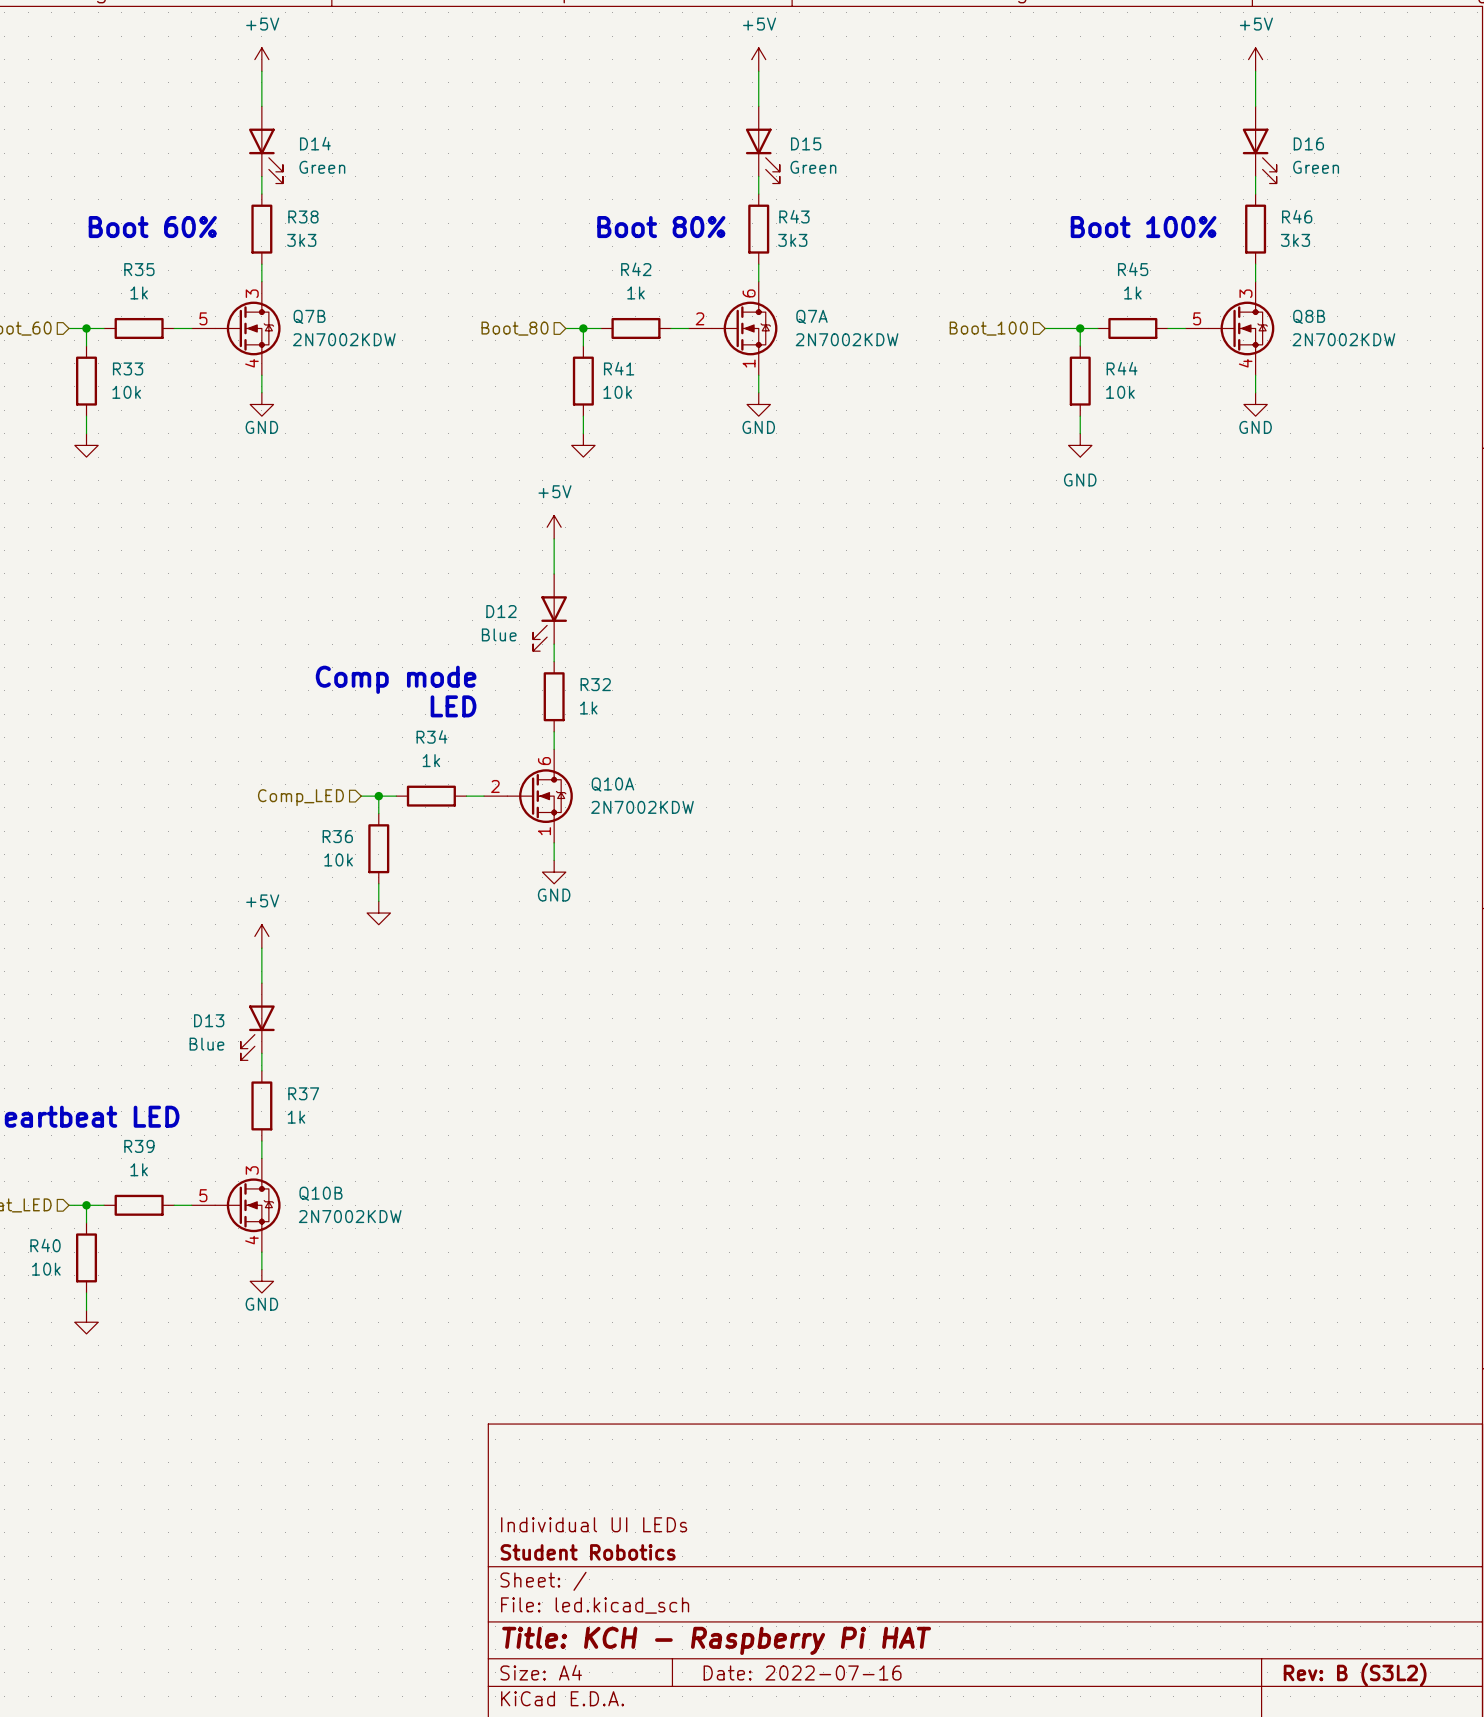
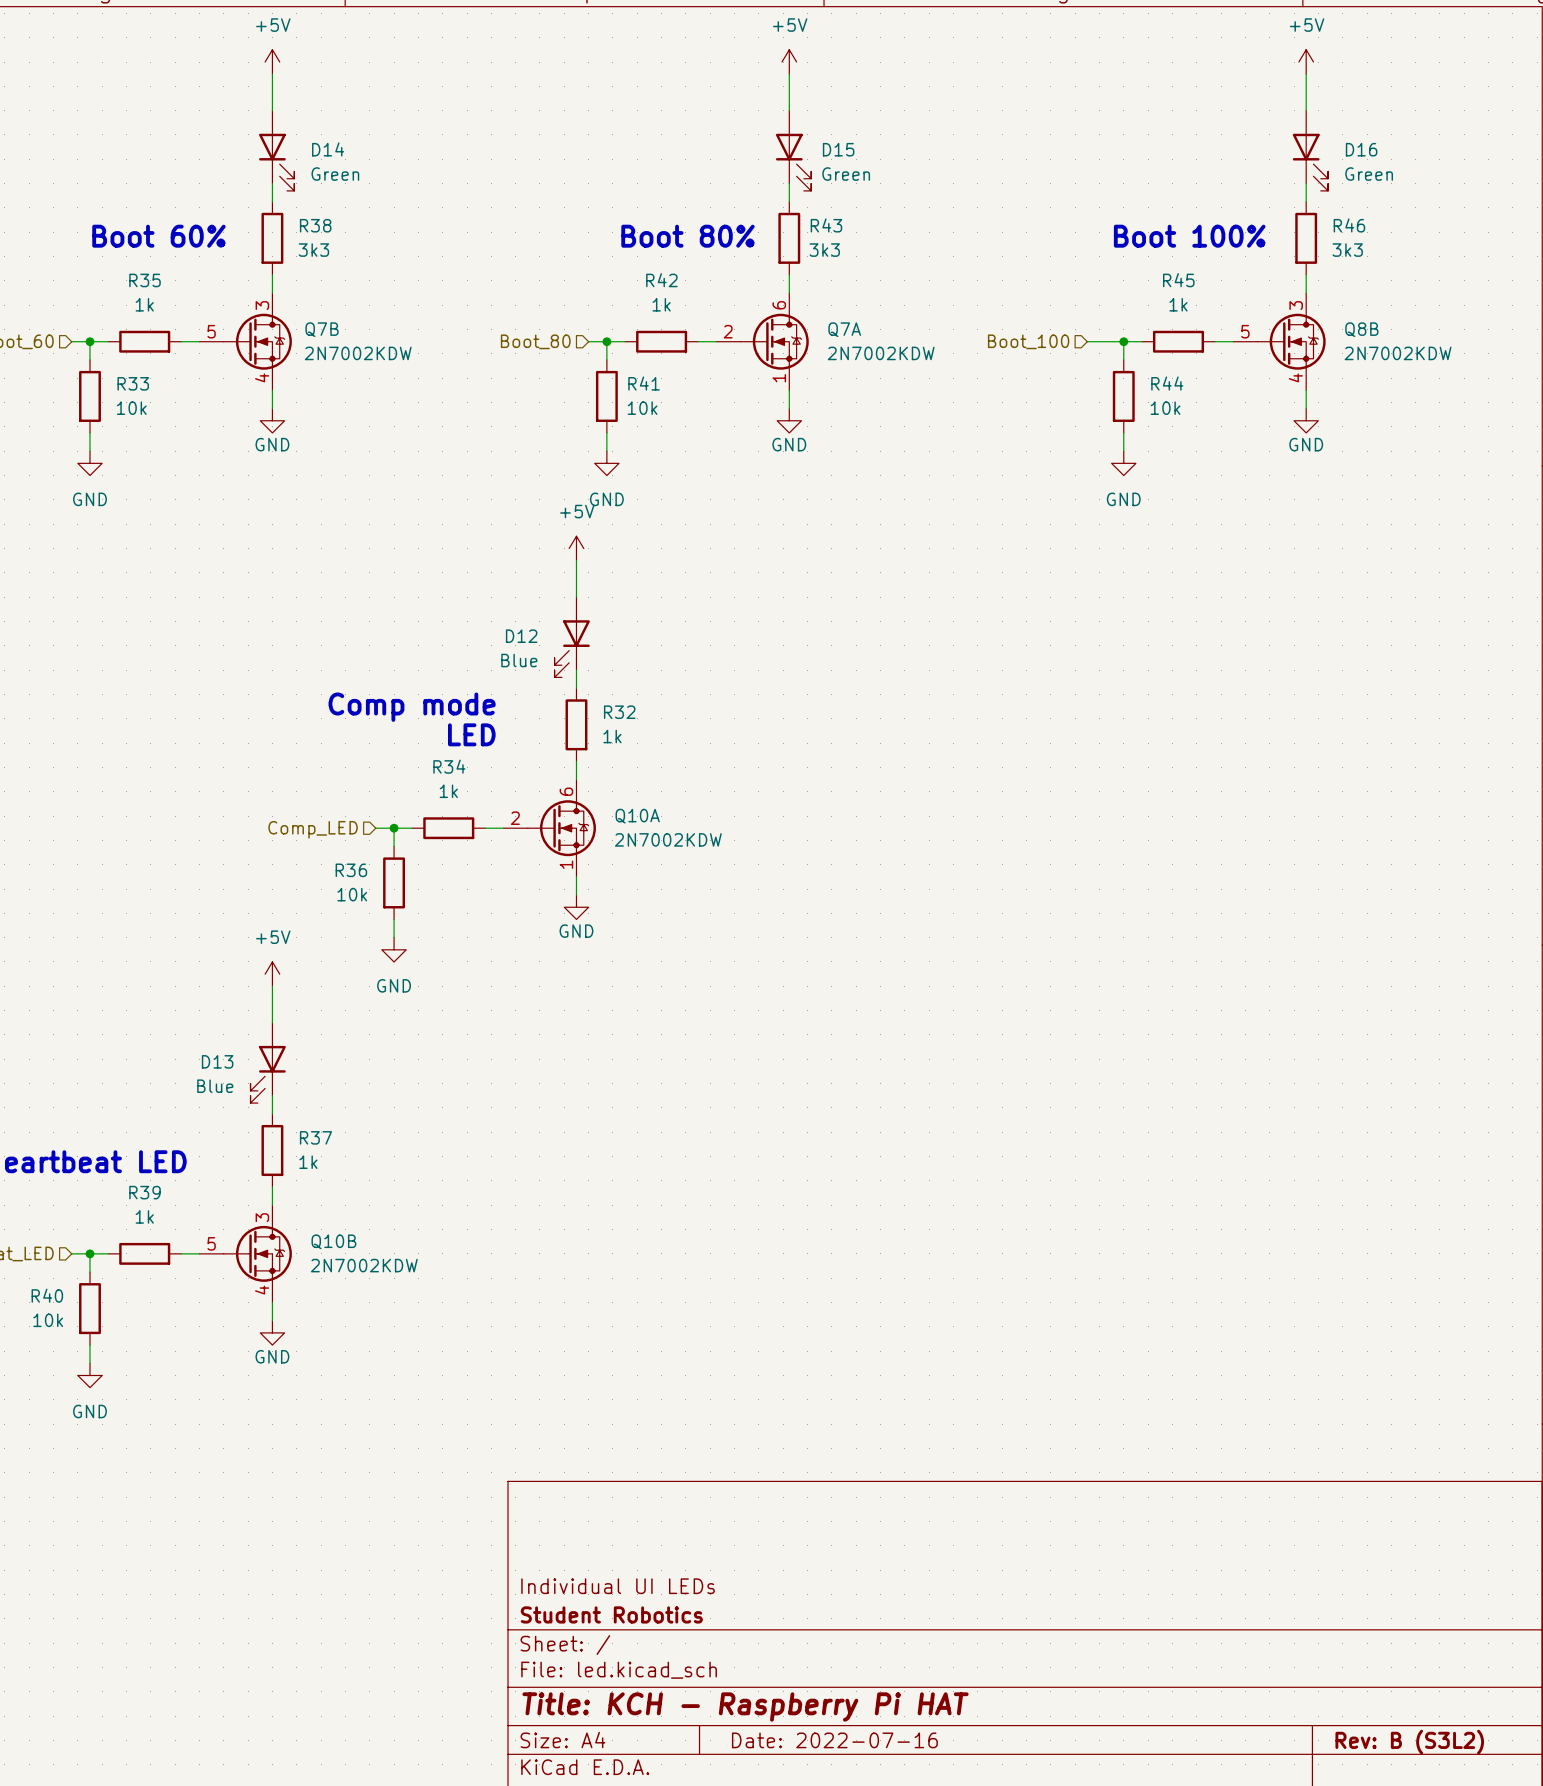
power symbol text: none -> GND (89, 499)
power symbol text: none -> GND (606, 499)
power symbol text: none -> GND (394, 985)
power symbol text: none -> GND (89, 1411)

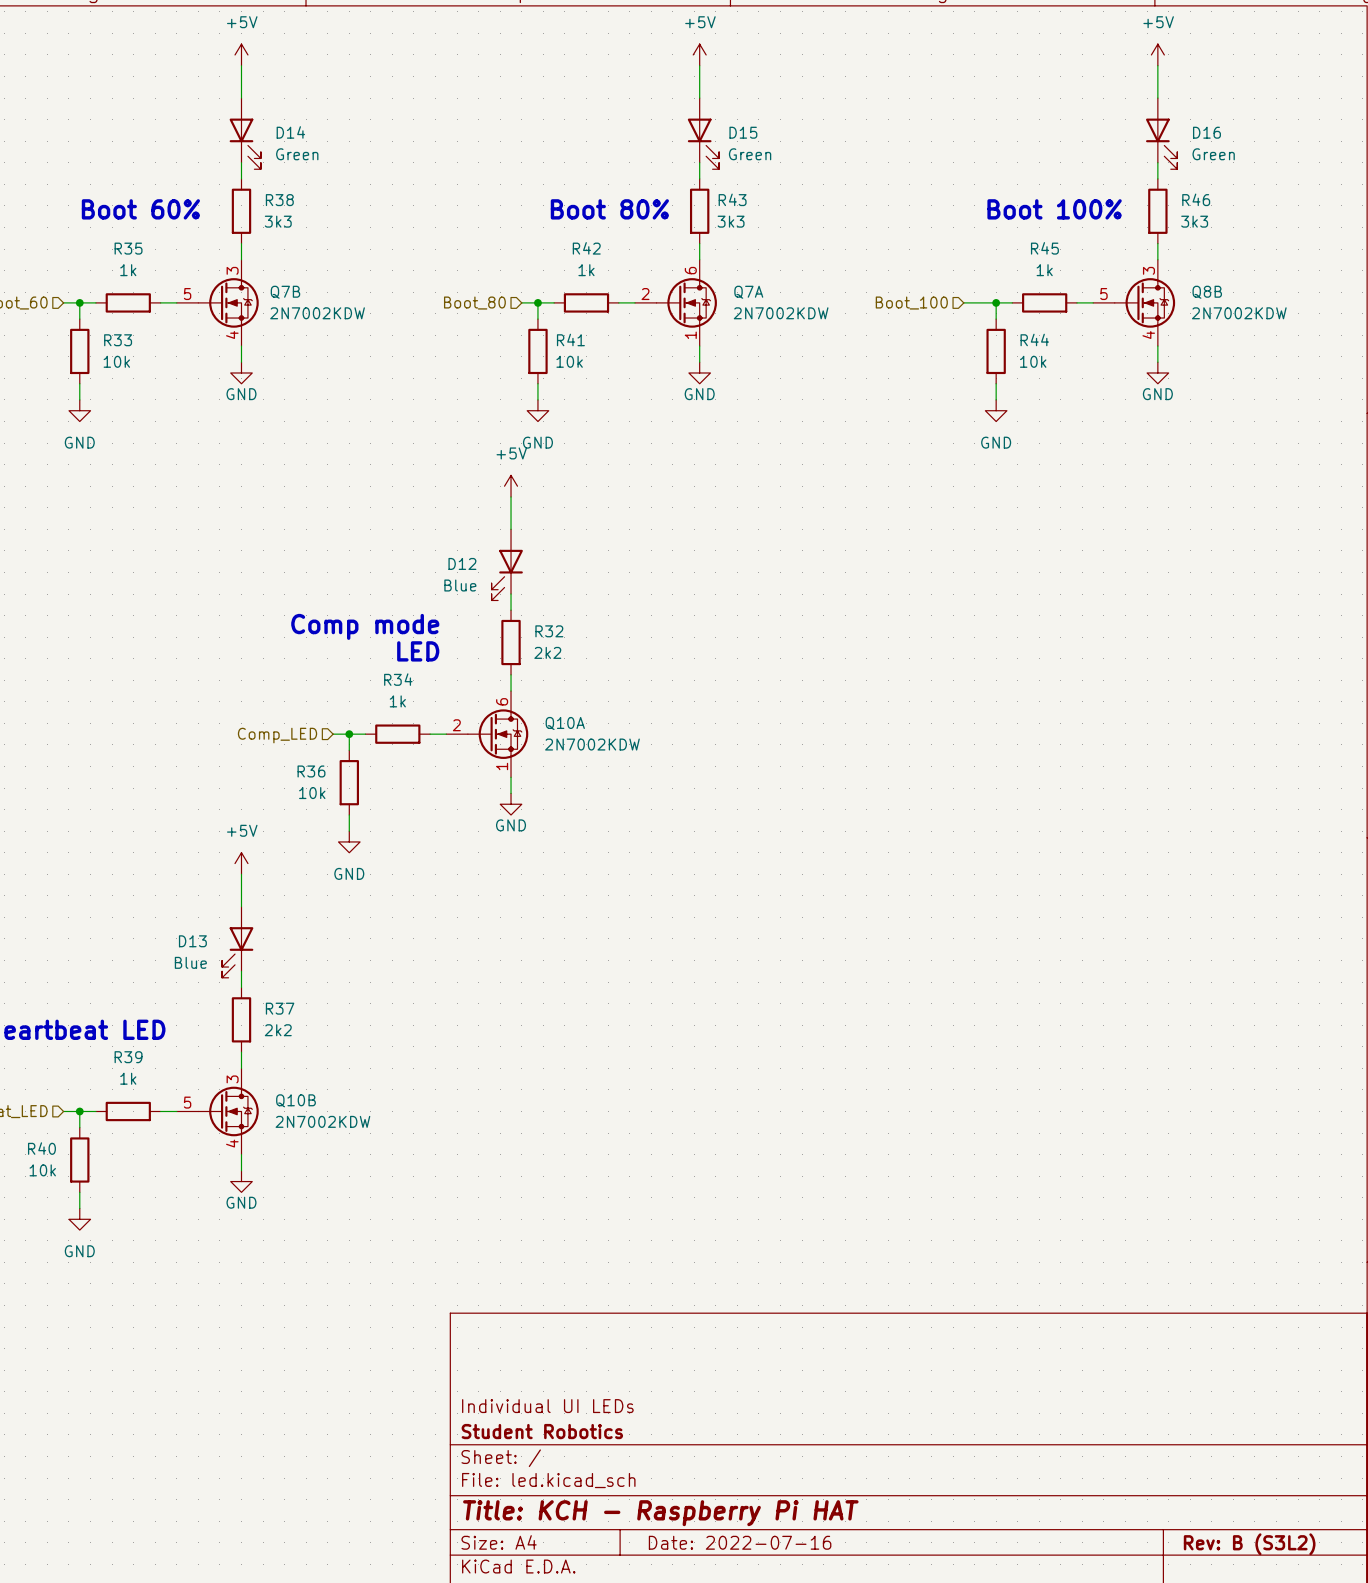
R32 value: 1k (612, 736) -> 2k2 (547, 652)
R37 value: 1k (308, 1162) -> 2k2 (278, 1030)

